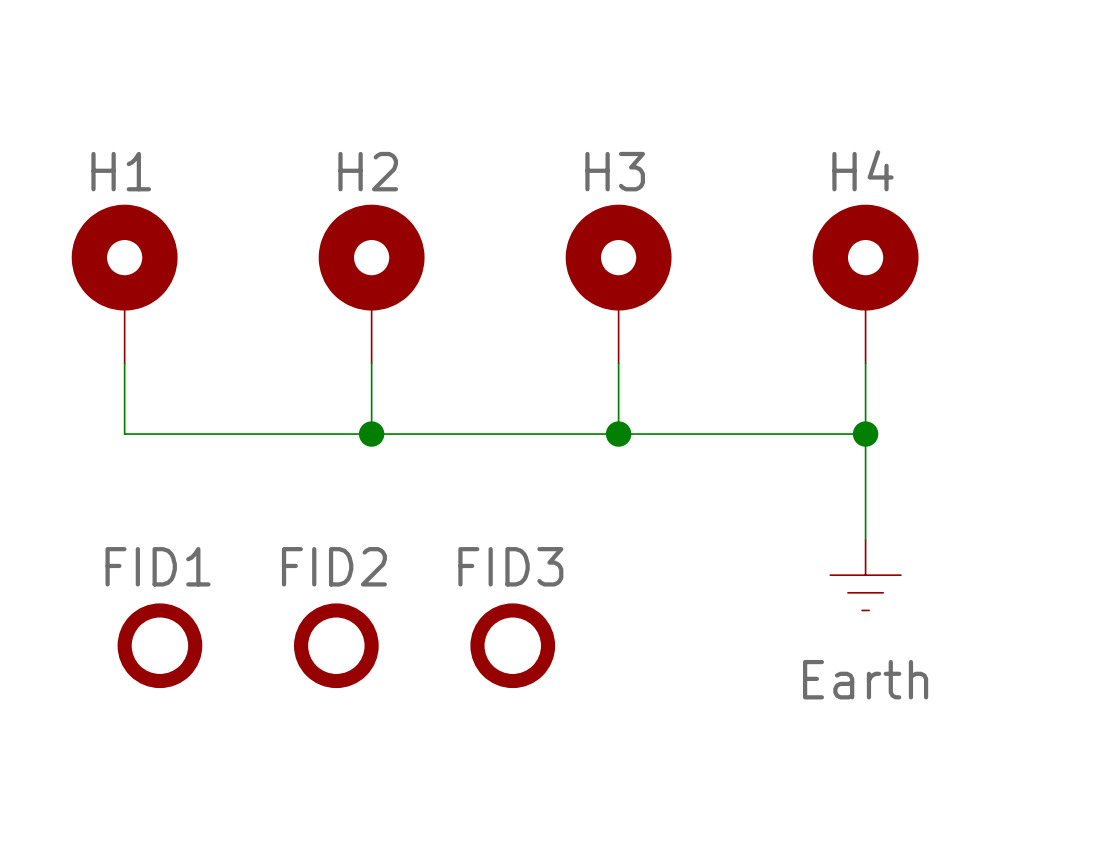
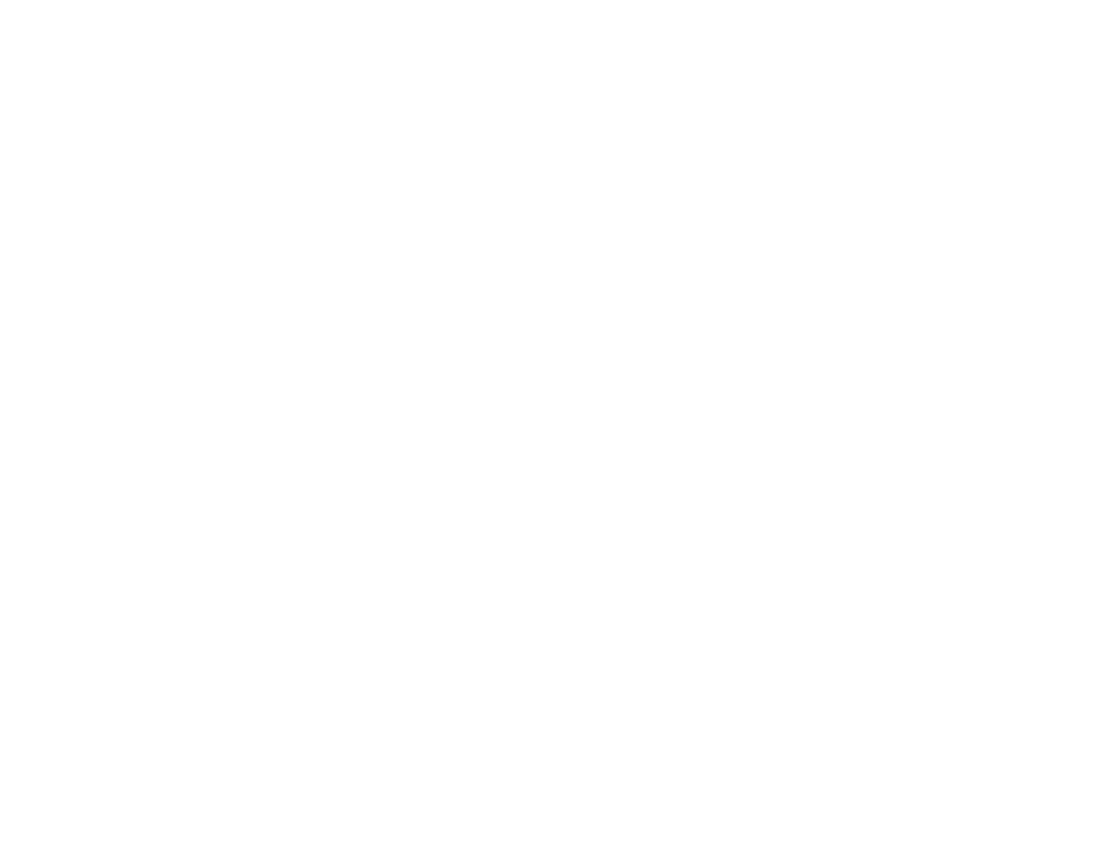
H1: (124, 284) -> none
H2: (371, 284) -> none
H3: (618, 284) -> none
H4: (865, 284) -> none
wire: (124, 363) (124, 434) (865, 434) -> none
wire: (371, 363) (371, 434) -> none
wire: (618, 363) (618, 434) -> none
wire: (865, 363) (865, 539) -> none
junction: (371, 434) -> none
junction: (618, 434) -> none
junction: (865, 434) -> none
power symbol: Earth (865, 575) -> none
FID1: (159, 645) -> none
FID2: (336, 645) -> none
FID3: (512, 645) -> none

